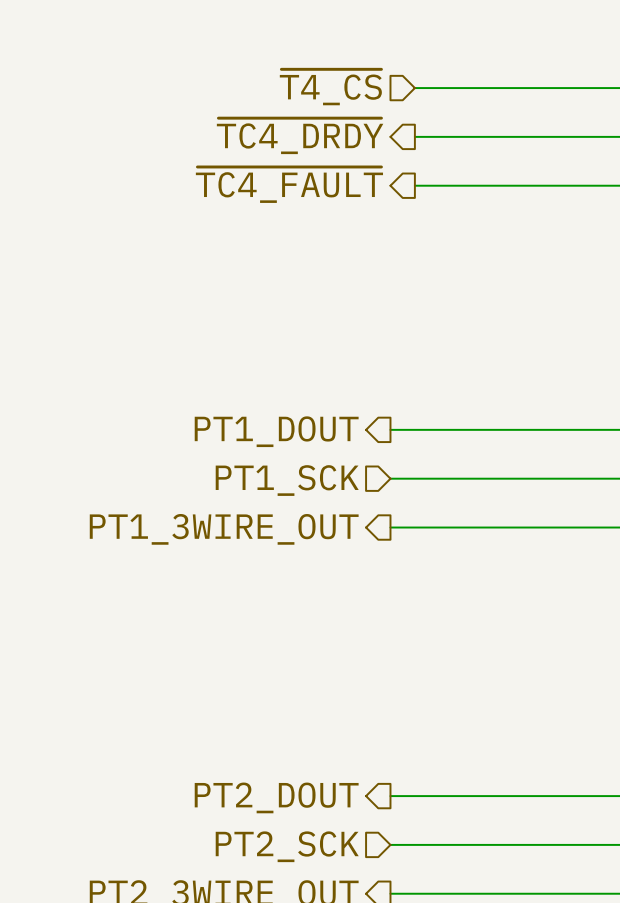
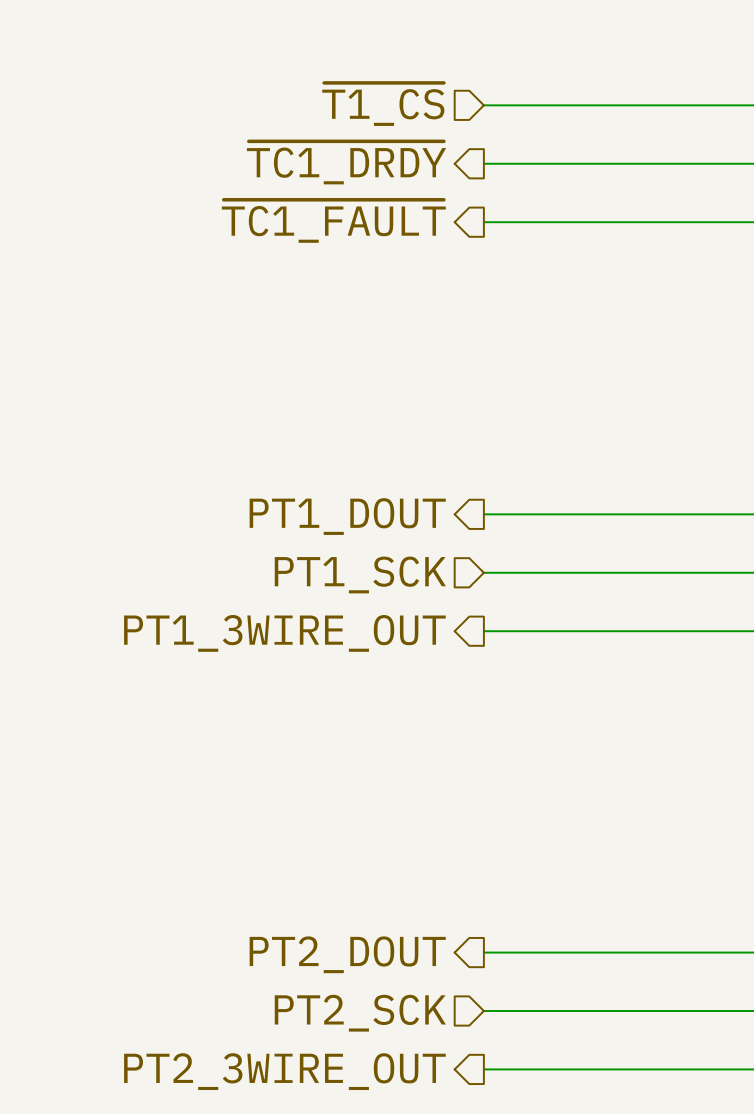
hierarchical label: ~{T4_CS} (330, 87) -> ~{T1_CS} (383, 104)
wire: none -> (483, 105) (513, 105)
hierarchical label: ~{TC4_DRDY} (300, 136) -> ~{TC1_DRDY} (346, 162)
wire: none -> (483, 163) (513, 163)
hierarchical label: ~{TC4_FAULT} (289, 184) -> ~{TC1_FAULT} (333, 221)
wire: none -> (483, 222) (513, 222)

